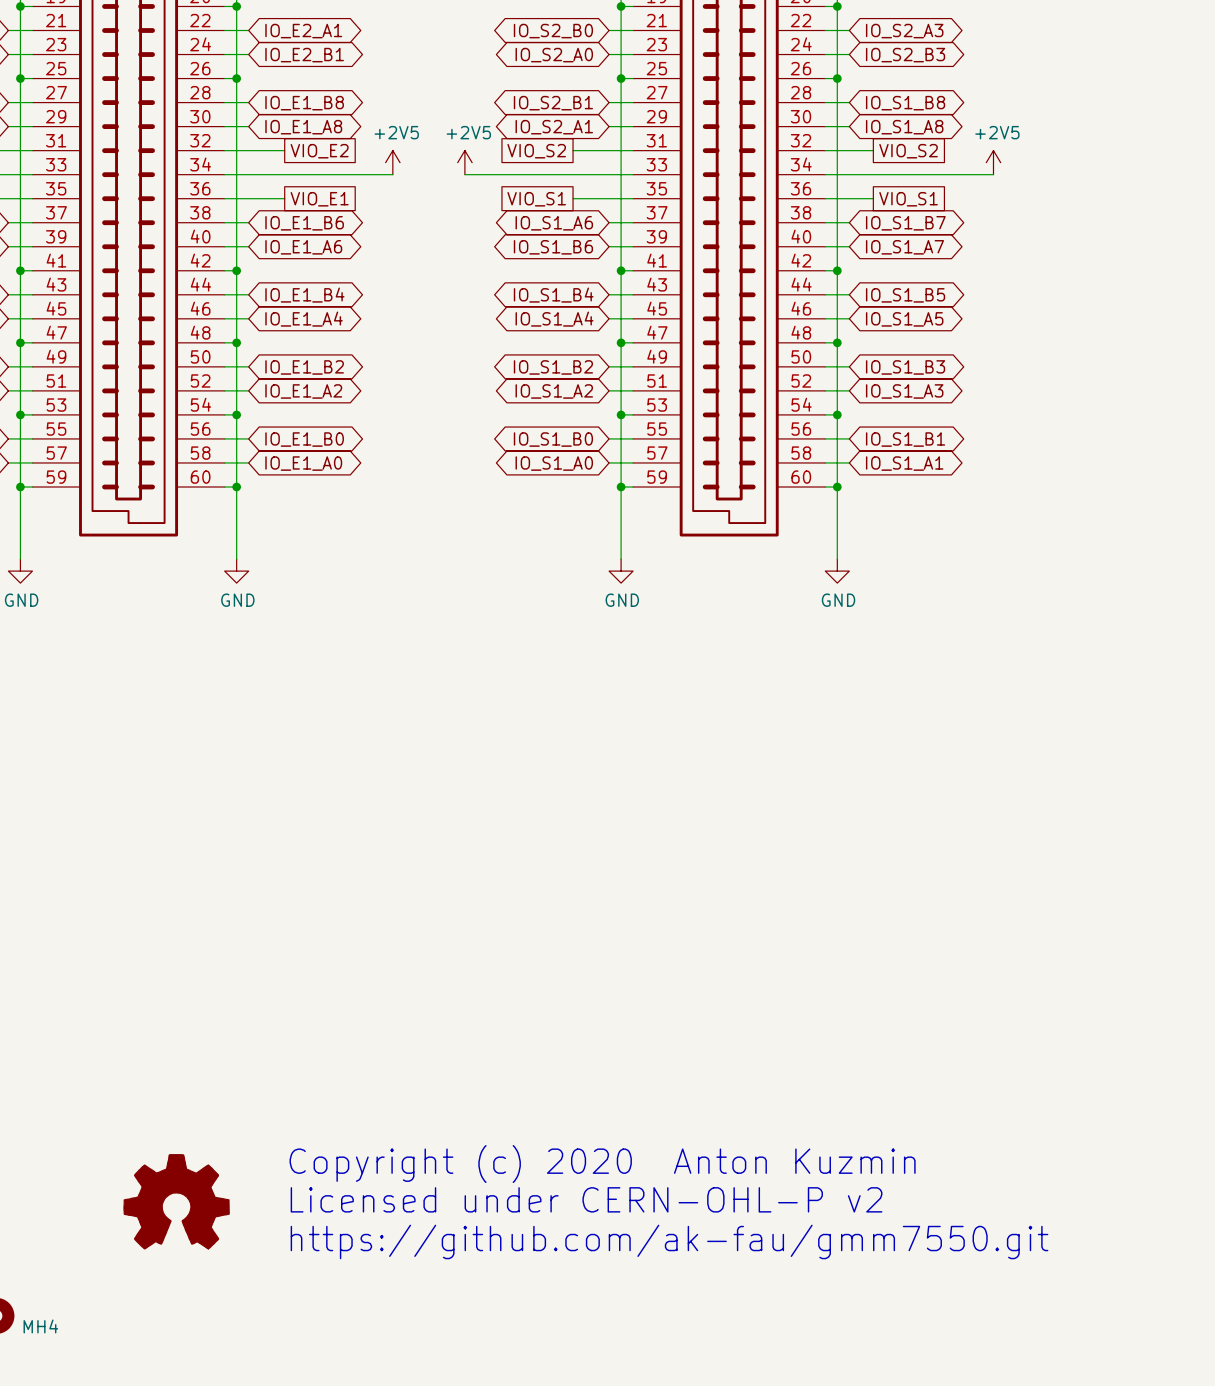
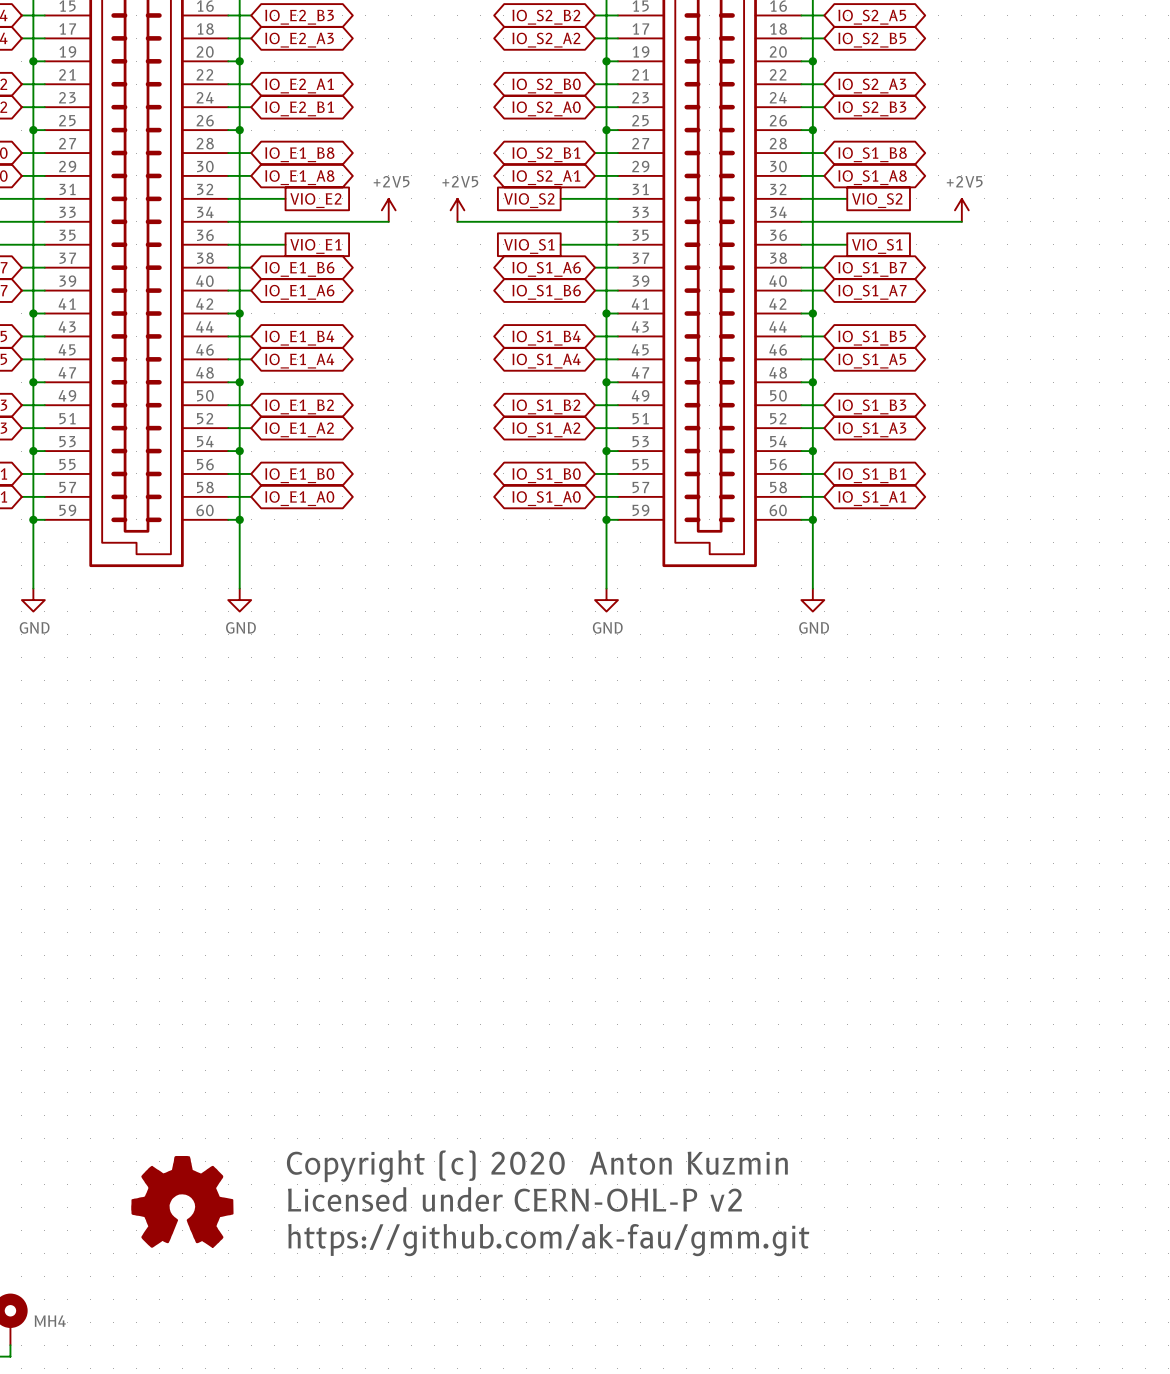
text: https://github.com/ak-fau/gmm7550.git (669, 1241) -> https://github.com/ak-fau/gmm.git (548, 1240)

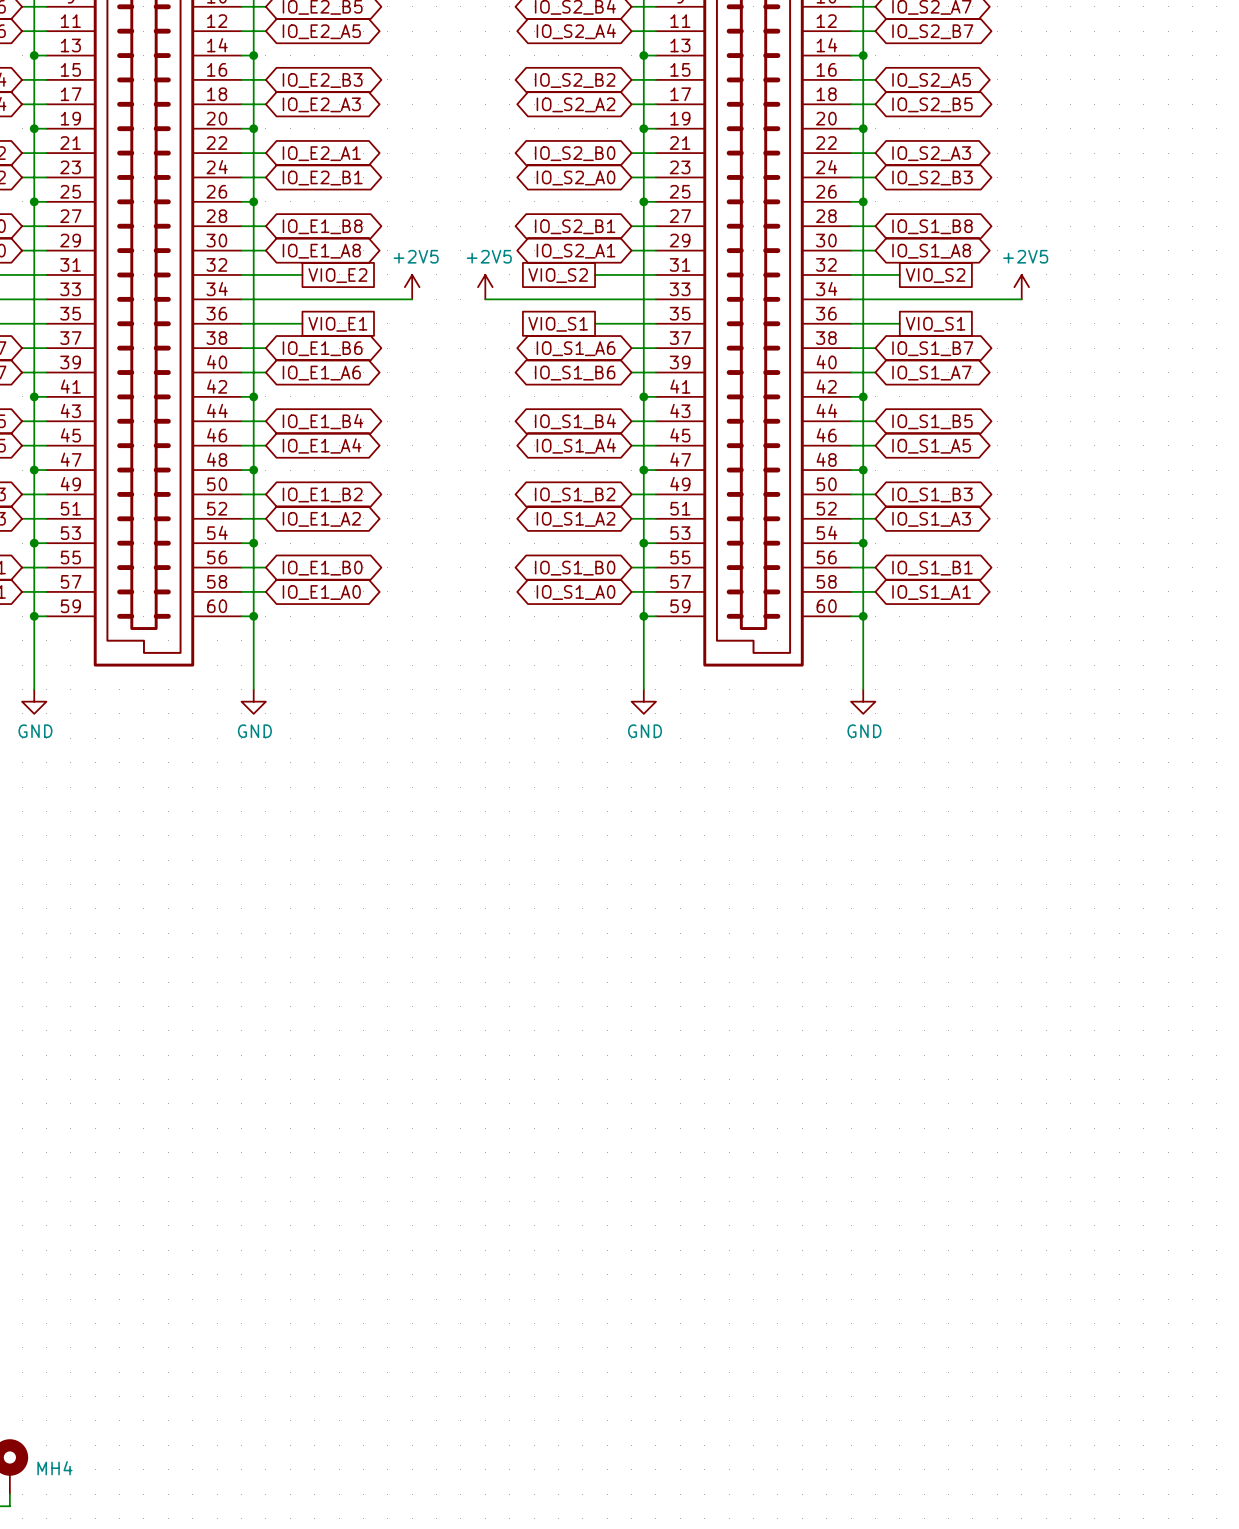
text: Copyright (c) 2020 Anton Kuzmin (537, 1166) -> none
text: Licensed under CERN-OHL-P v2 (514, 1199) -> none
power symbol: (182, 1201) -> none
text: https://github.com/ak-fau/gmm.git (548, 1240) -> none

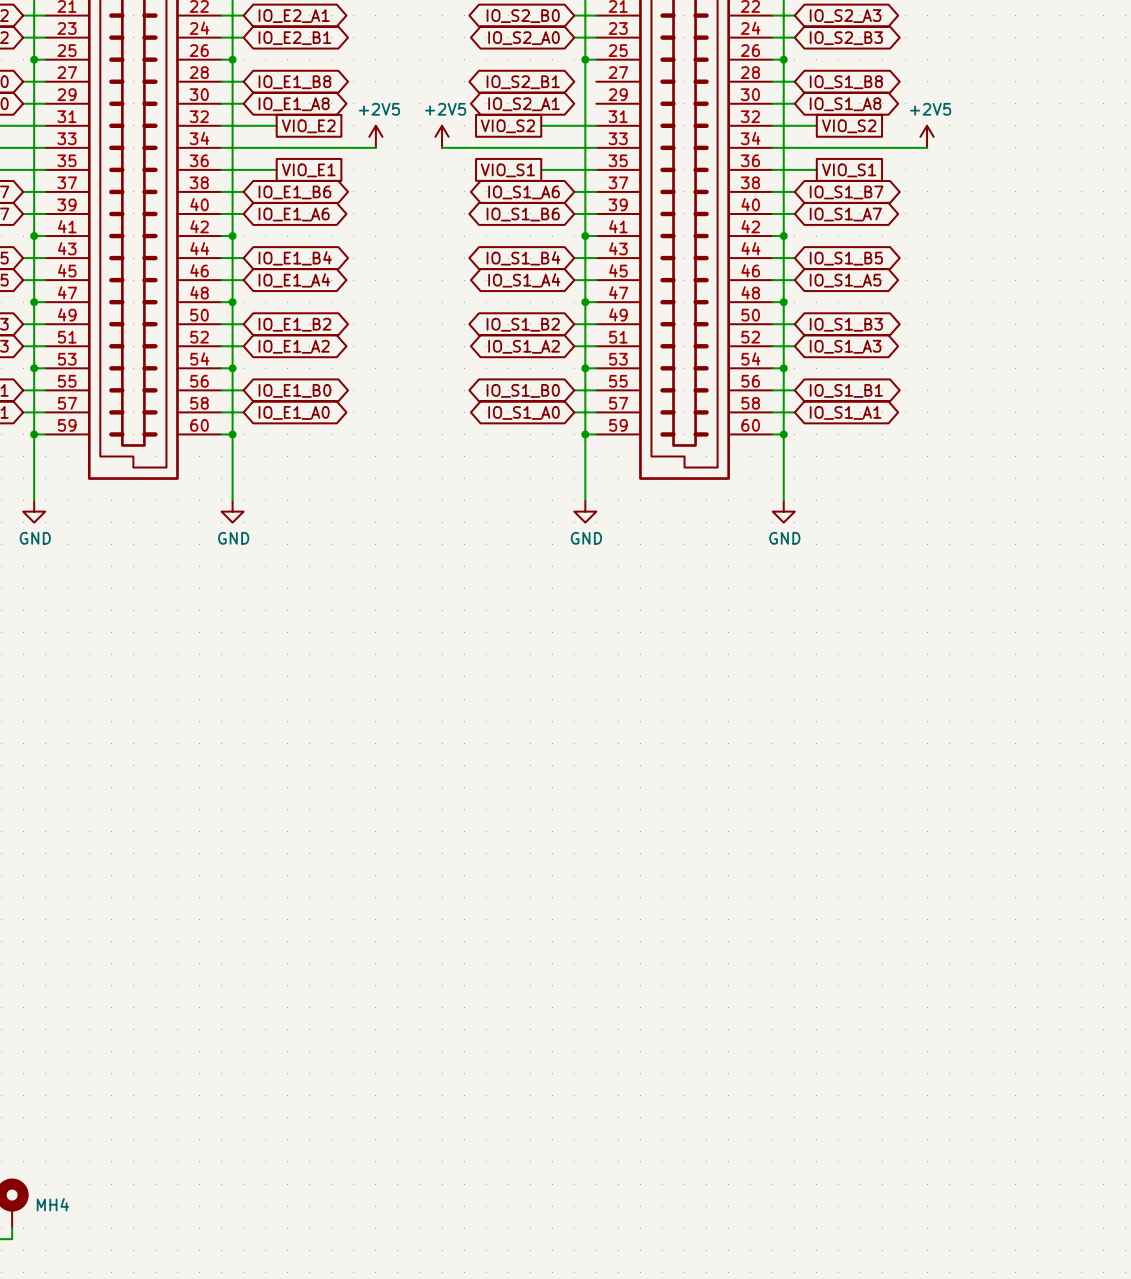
wire: (631, 226) (655, 226) -> none
wire: (631, 250) (655, 250) -> none

